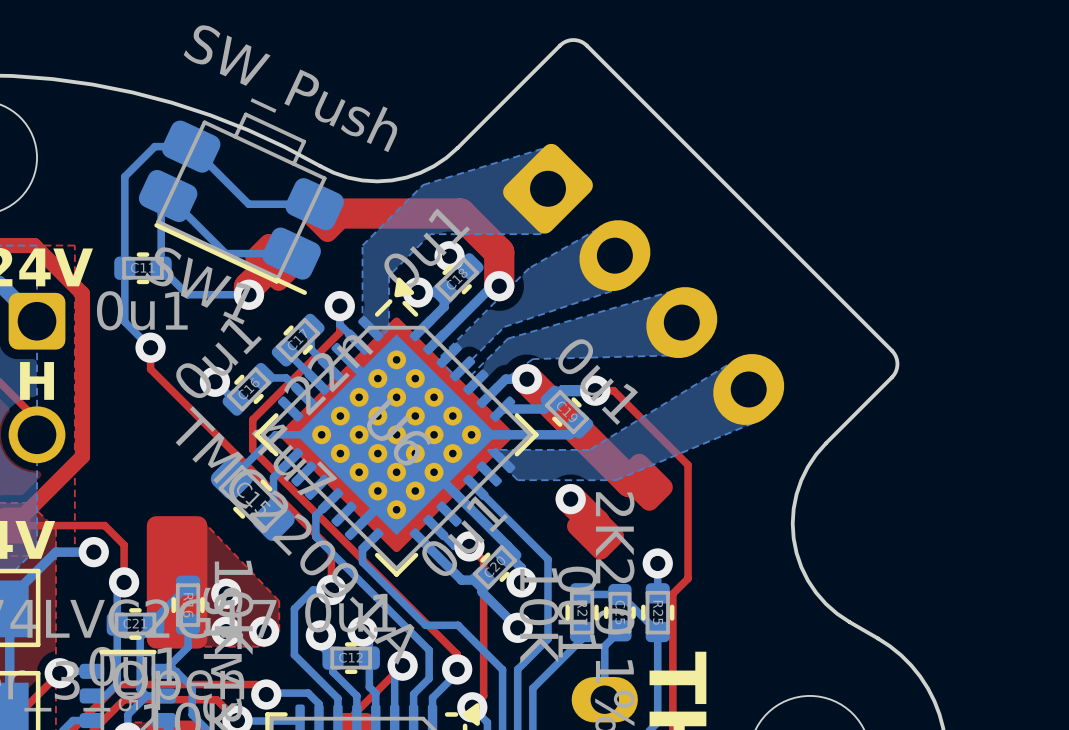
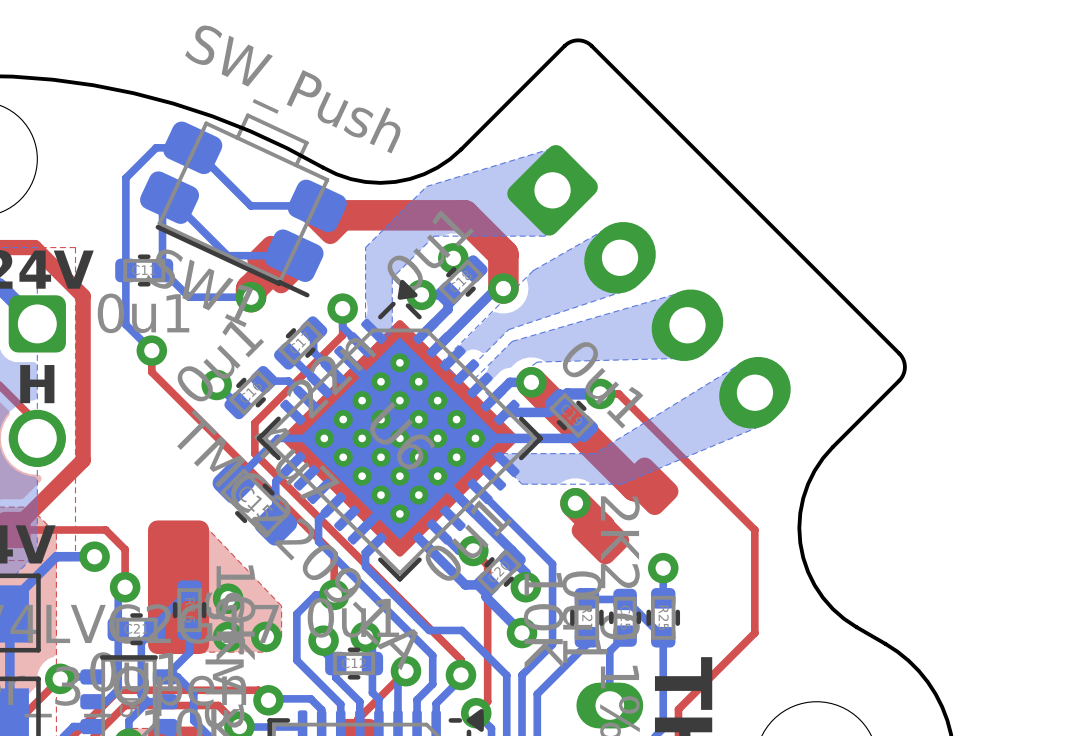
top track: (688, 465) (688, 578) (672, 593) (672, 703) -> (693, 468) (754, 529) (754, 633) (678, 709)

